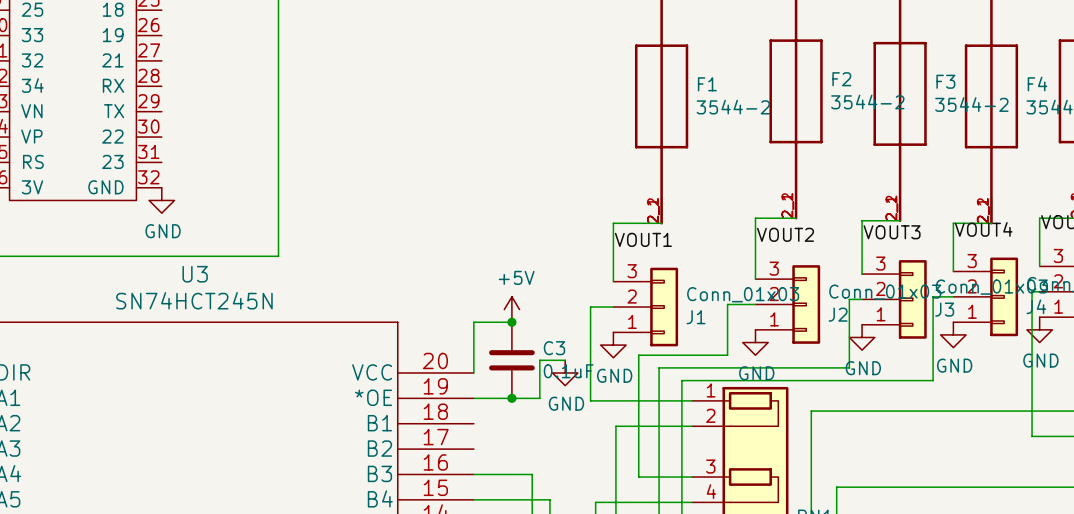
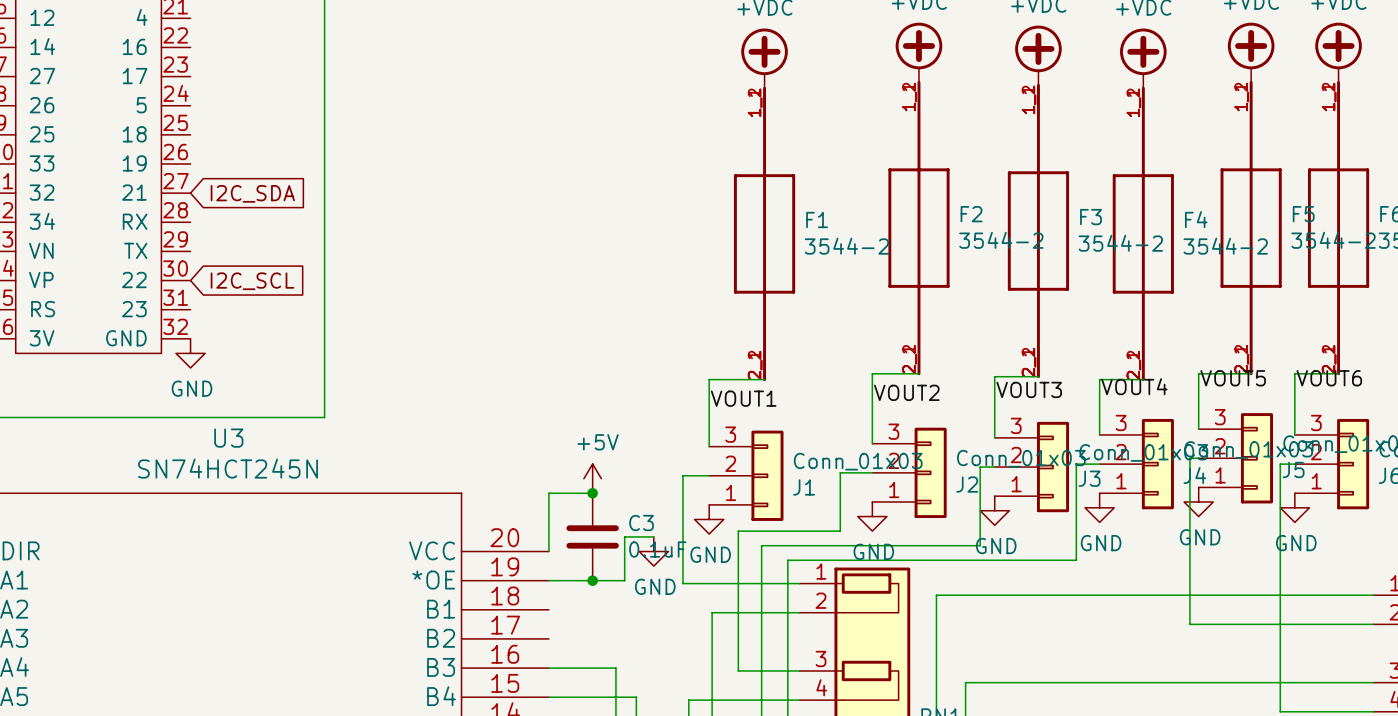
global label: none -> I2C_SDA (252, 193)
global label: none -> I2C_SCL (252, 281)

